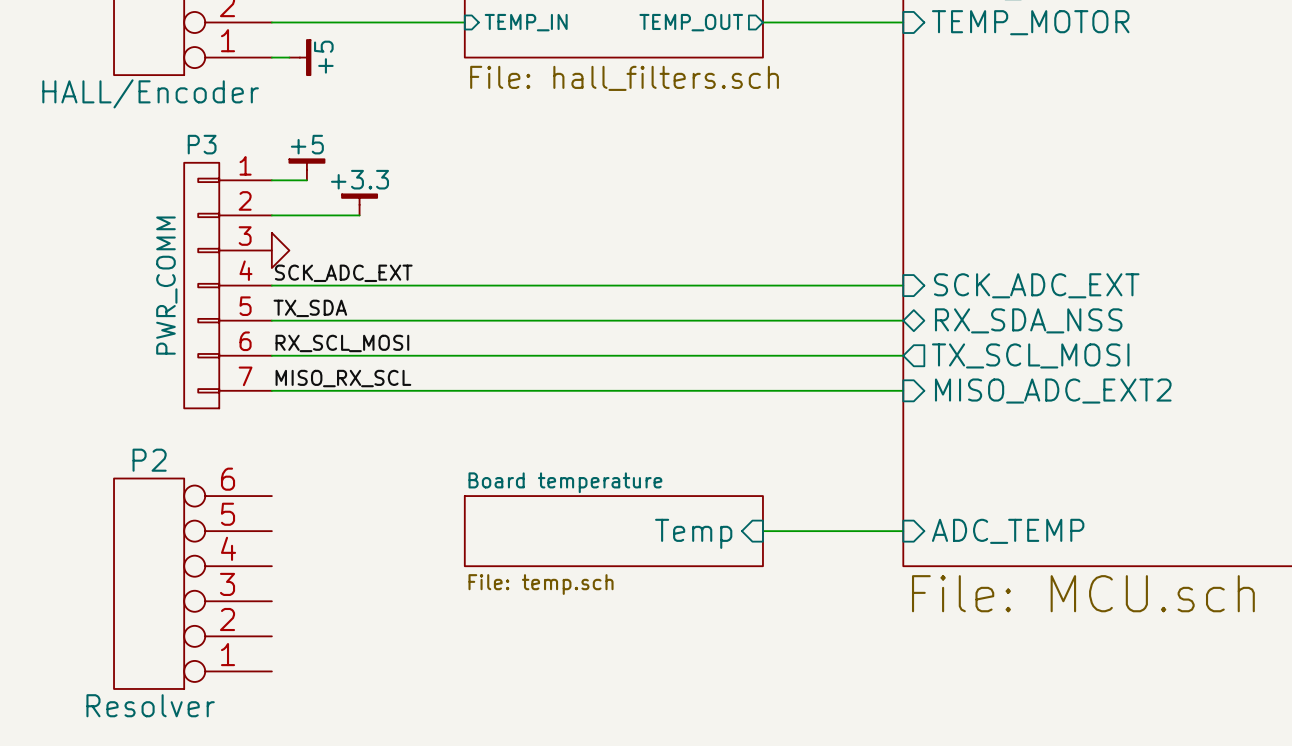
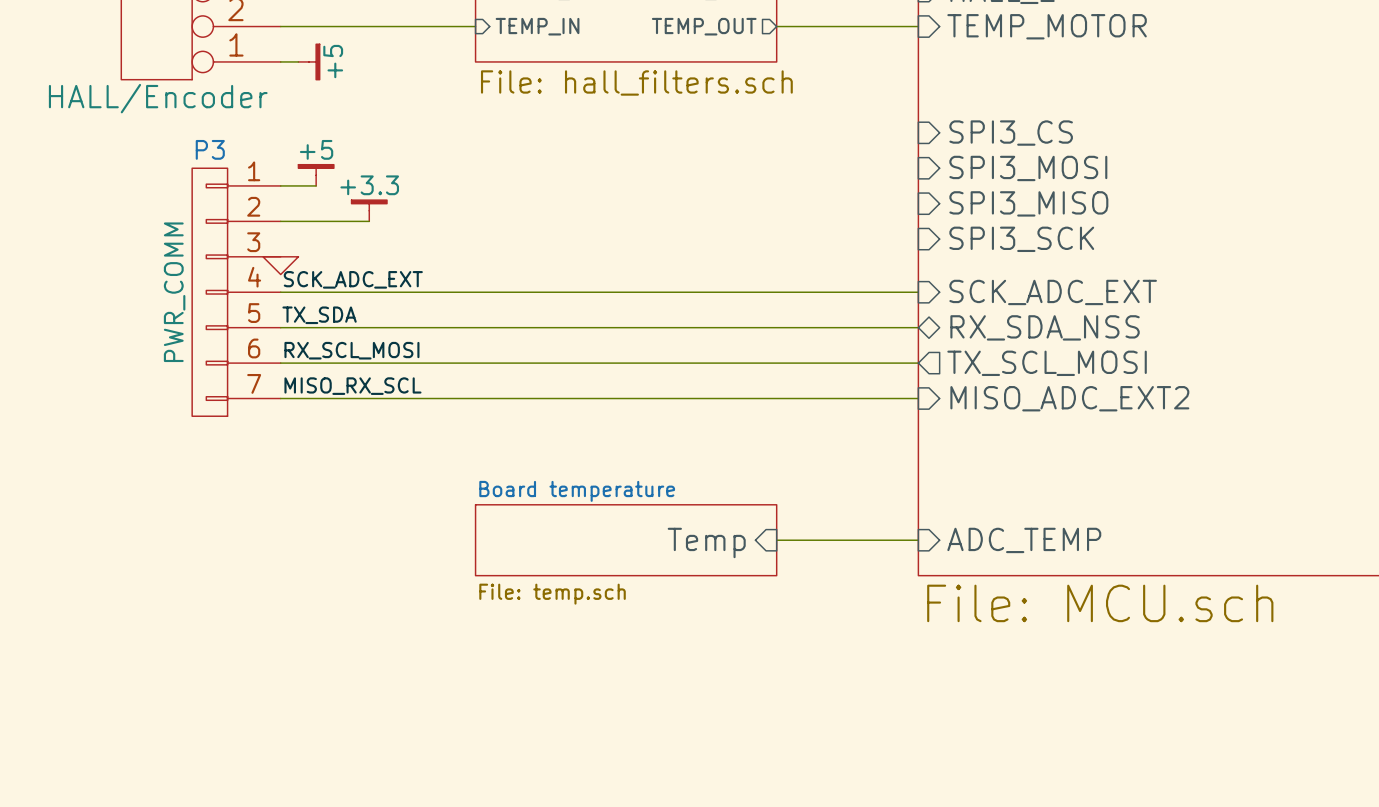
sheet pin: none -> SPI3_CS (1011, 133)
sheet pin: none -> SPI3_MOSI (1028, 168)
sheet pin: none -> SPI3_MISO (1028, 203)
sheet pin: none -> SPI3_SCK (1021, 239)
power symbol rotation: 0° (280, 250) -> 90° clockwise (280, 265)
P2: Resolver (192, 583) -> none

